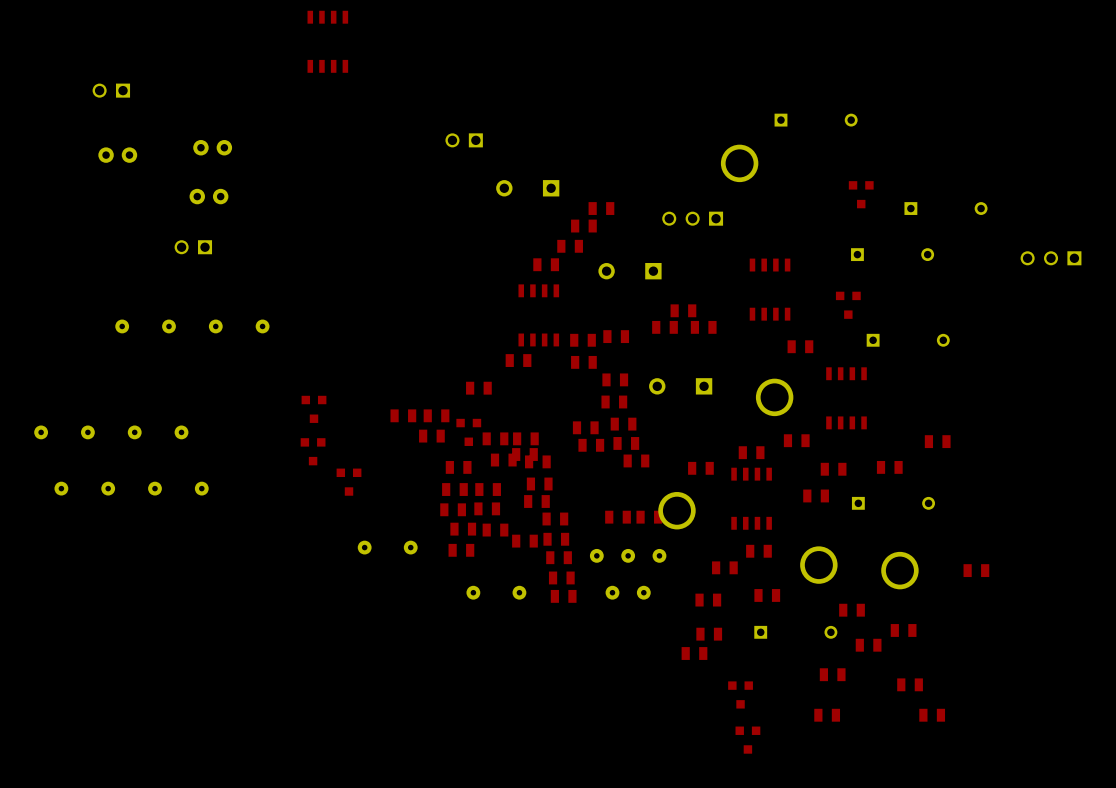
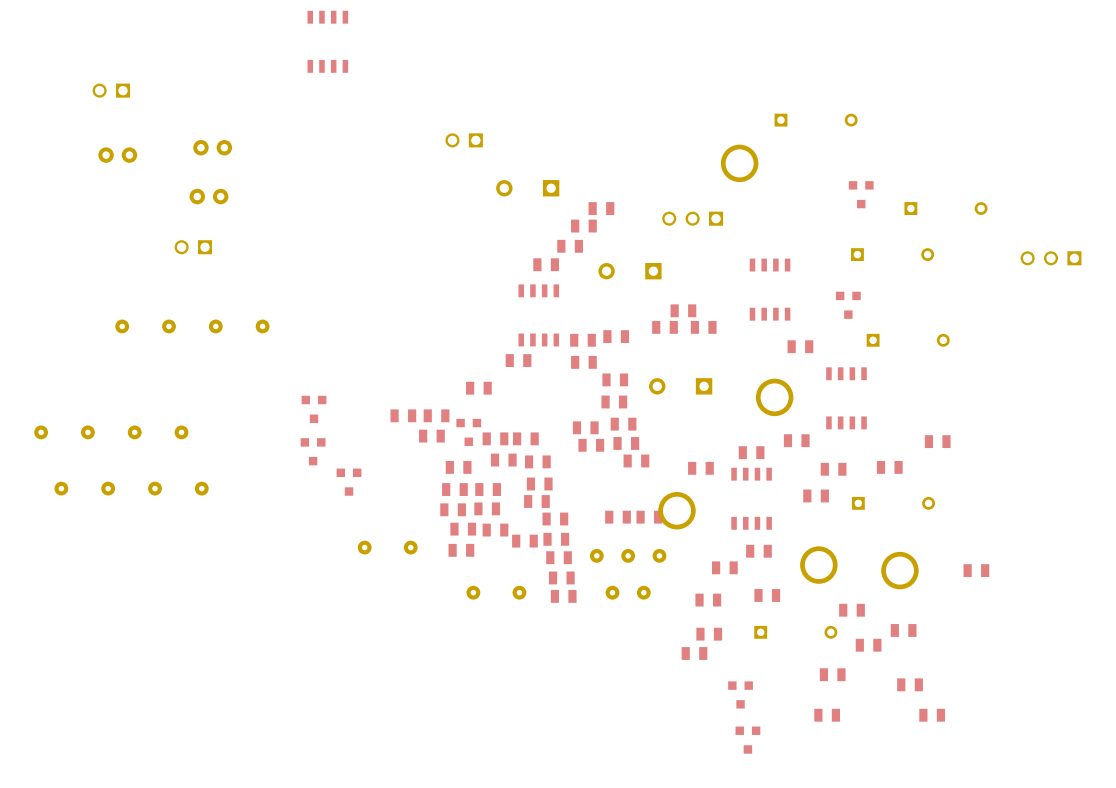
part: (524, 454) -> none

